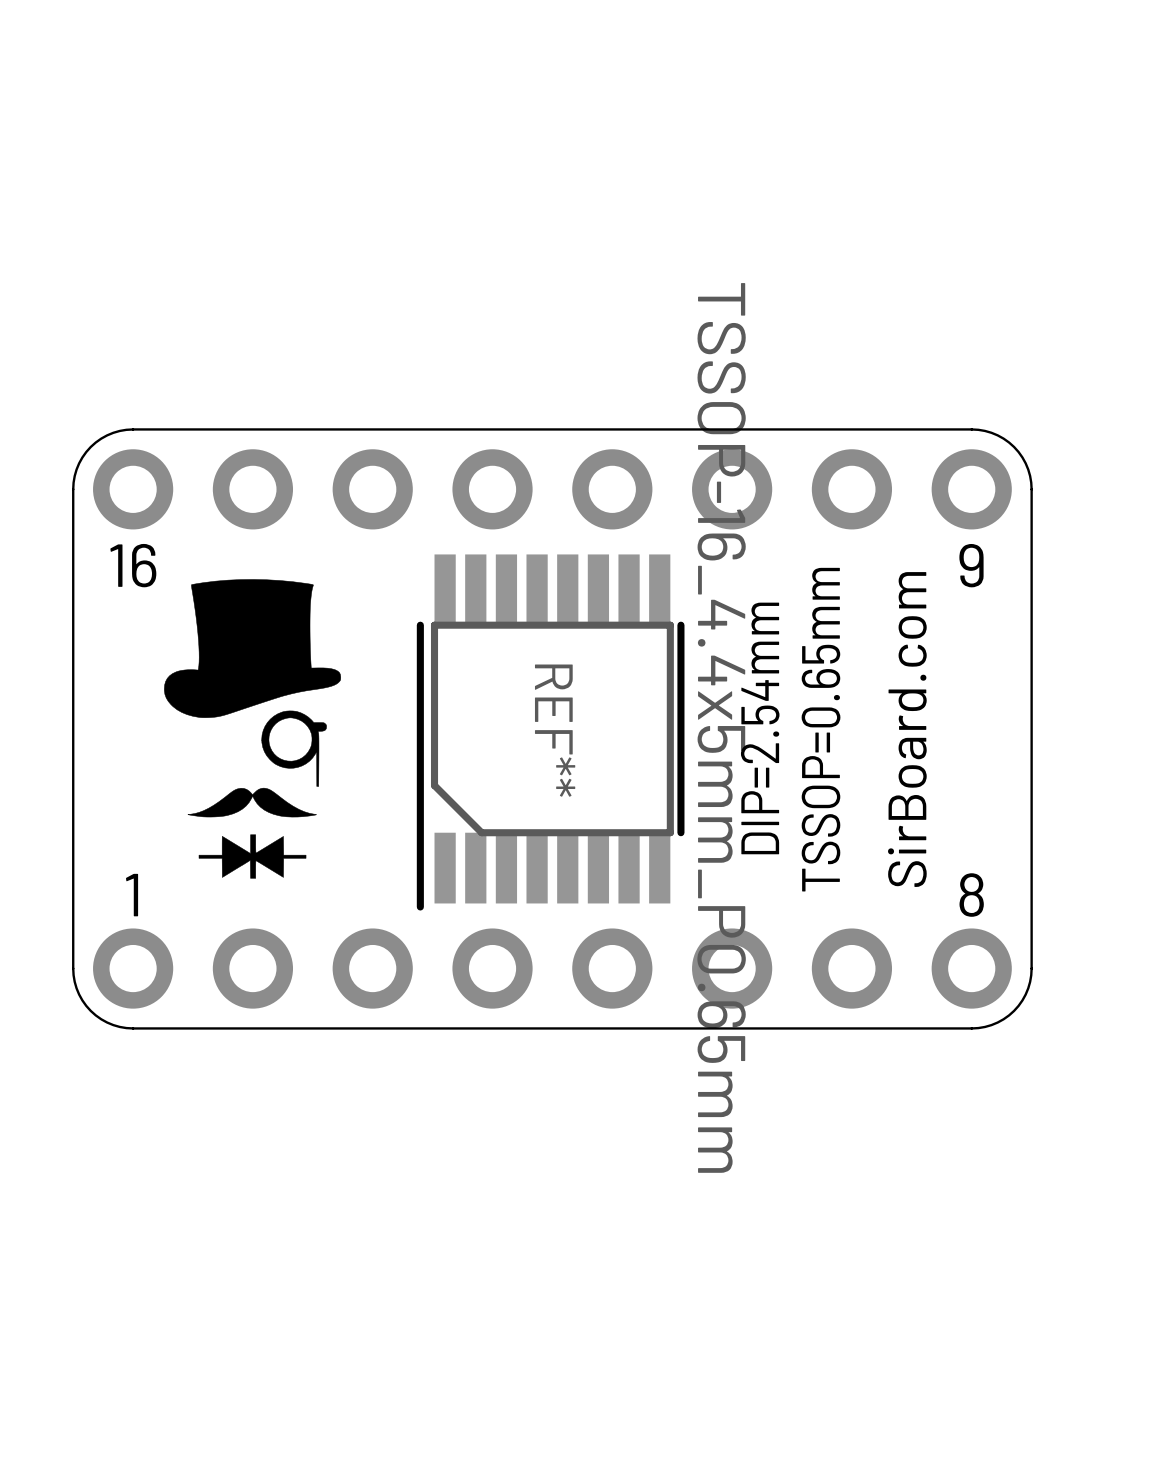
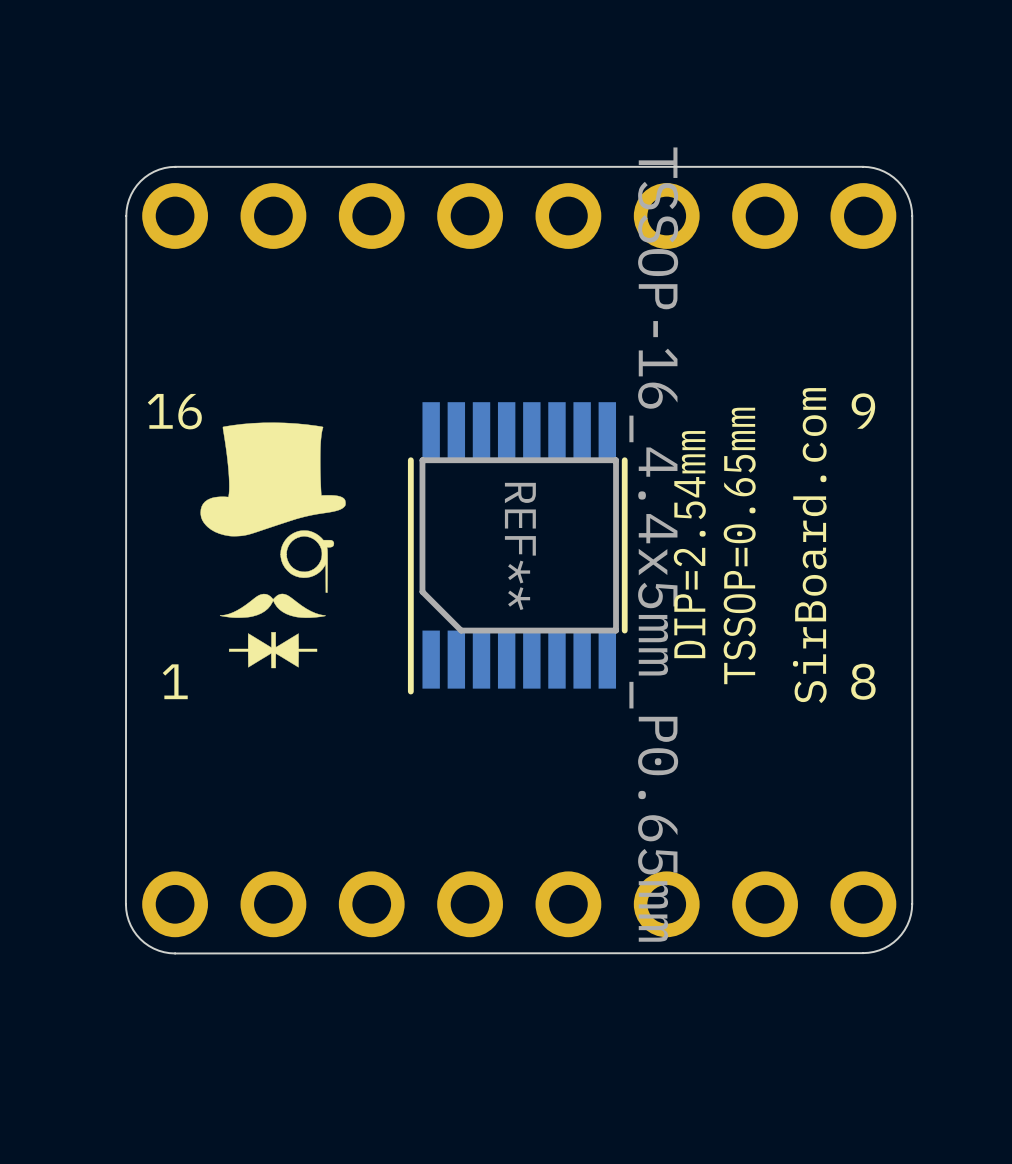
board edge: (971, 429) (133, 429) (119, 430) (101, 438) (90, 446) (82, 457) (76, 469) (73, 489) (73, 968) (76, 988) (82, 1000) (95, 1015) (107, 1022) (119, 1026) (133, 1028) (971, 1028) (991, 1025) (1003, 1019) (1018, 1005) (1025, 994) (1030, 981) (1031, 968) (1031, 489) (1028, 469) (1022, 457) (1014, 446) (997, 435) (985, 430) (971, 429) -> (863, 166) (884, 171) (897, 181) (907, 194) (912, 216) (912, 903) (909, 920) (897, 938) (884, 948) (863, 953) (175, 953) (153, 948) (140, 939) (130, 925) (125, 904) (126, 216) (129, 199) (140, 181) (159, 169) (175, 166) (863, 166)
part position: (552, 489) -> (519, 216)
part position: (552, 968) -> (519, 904)

